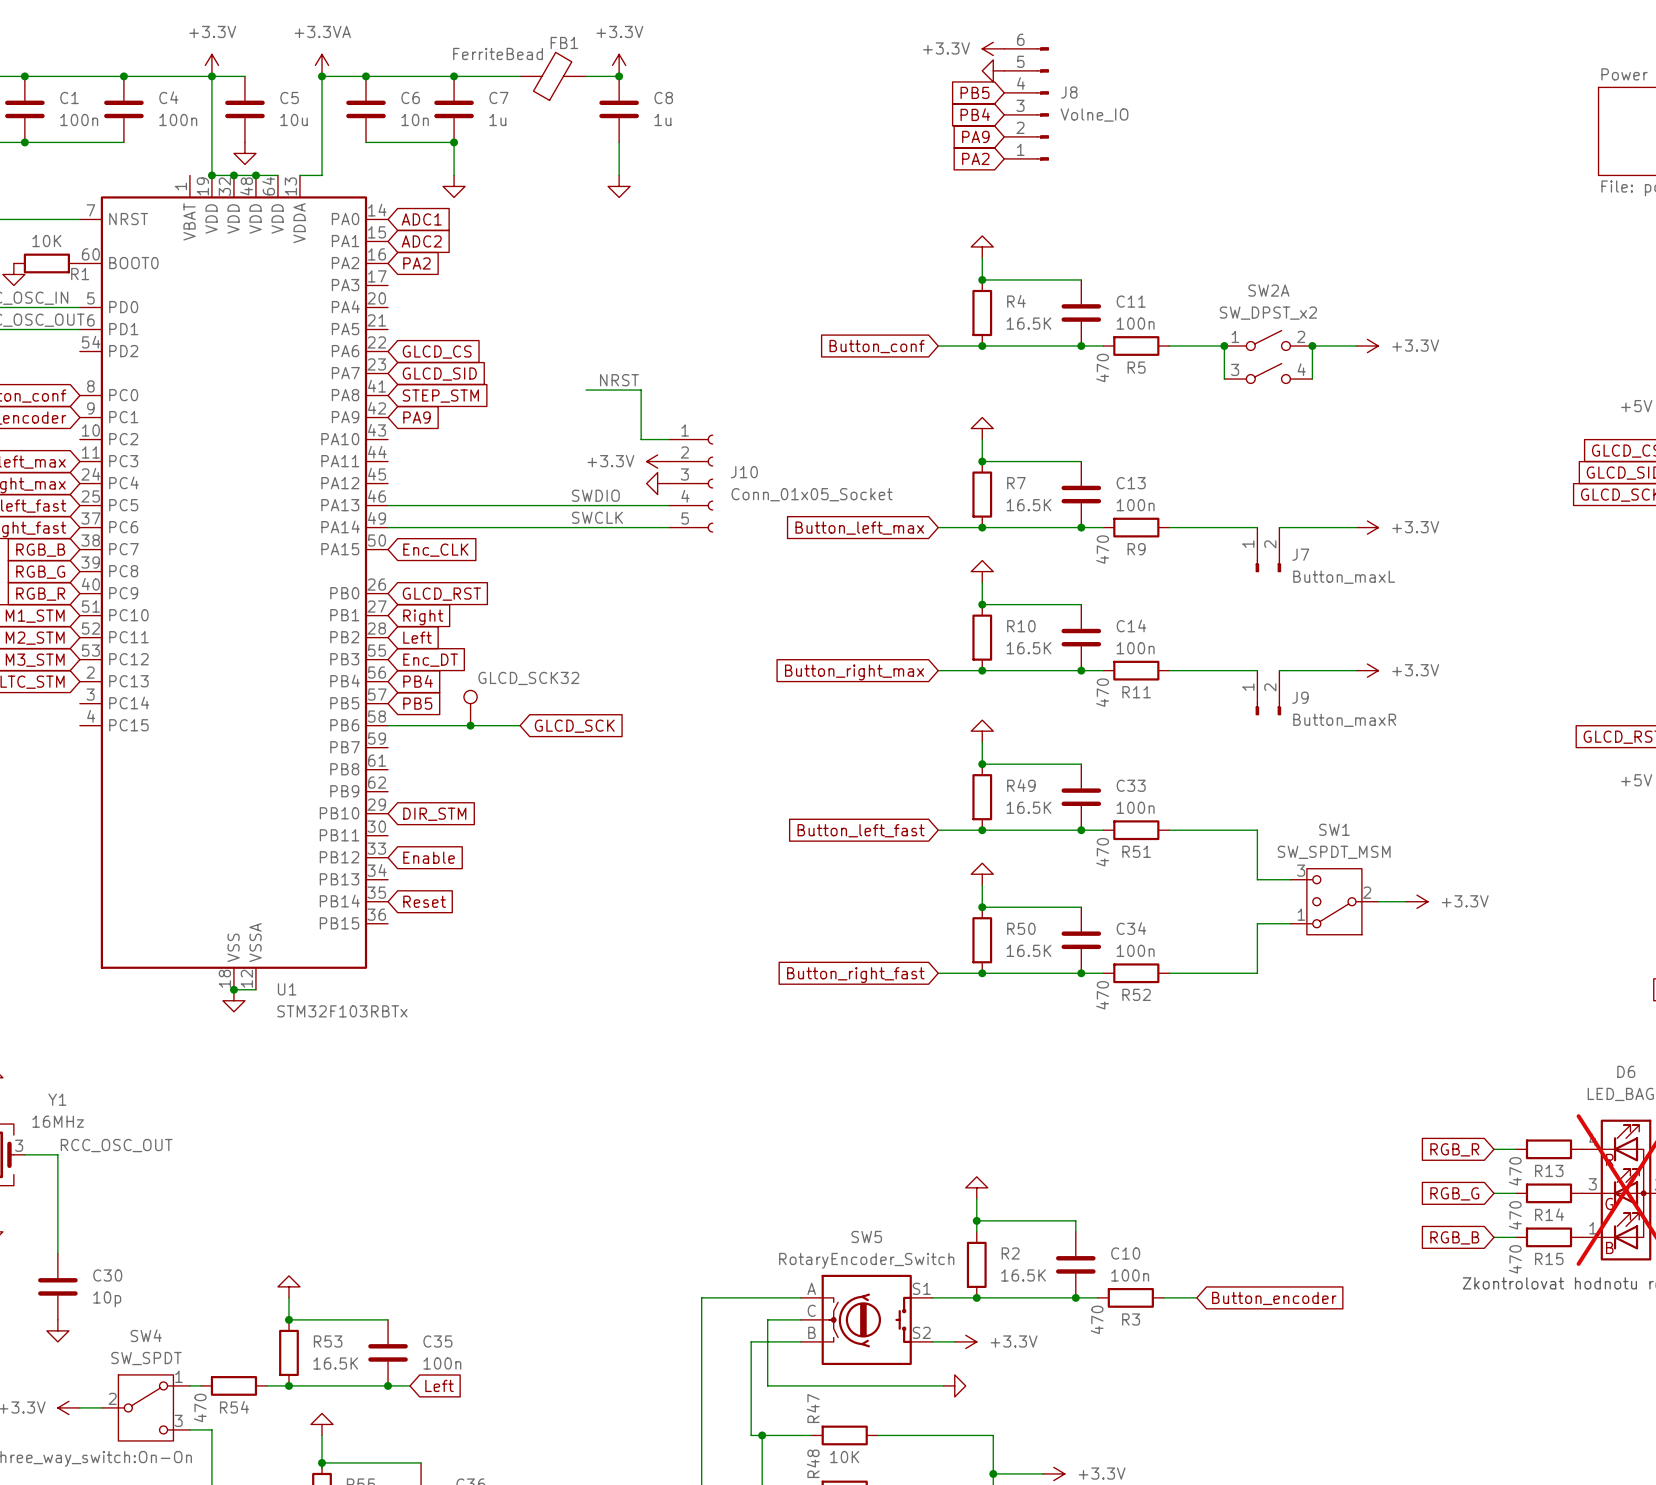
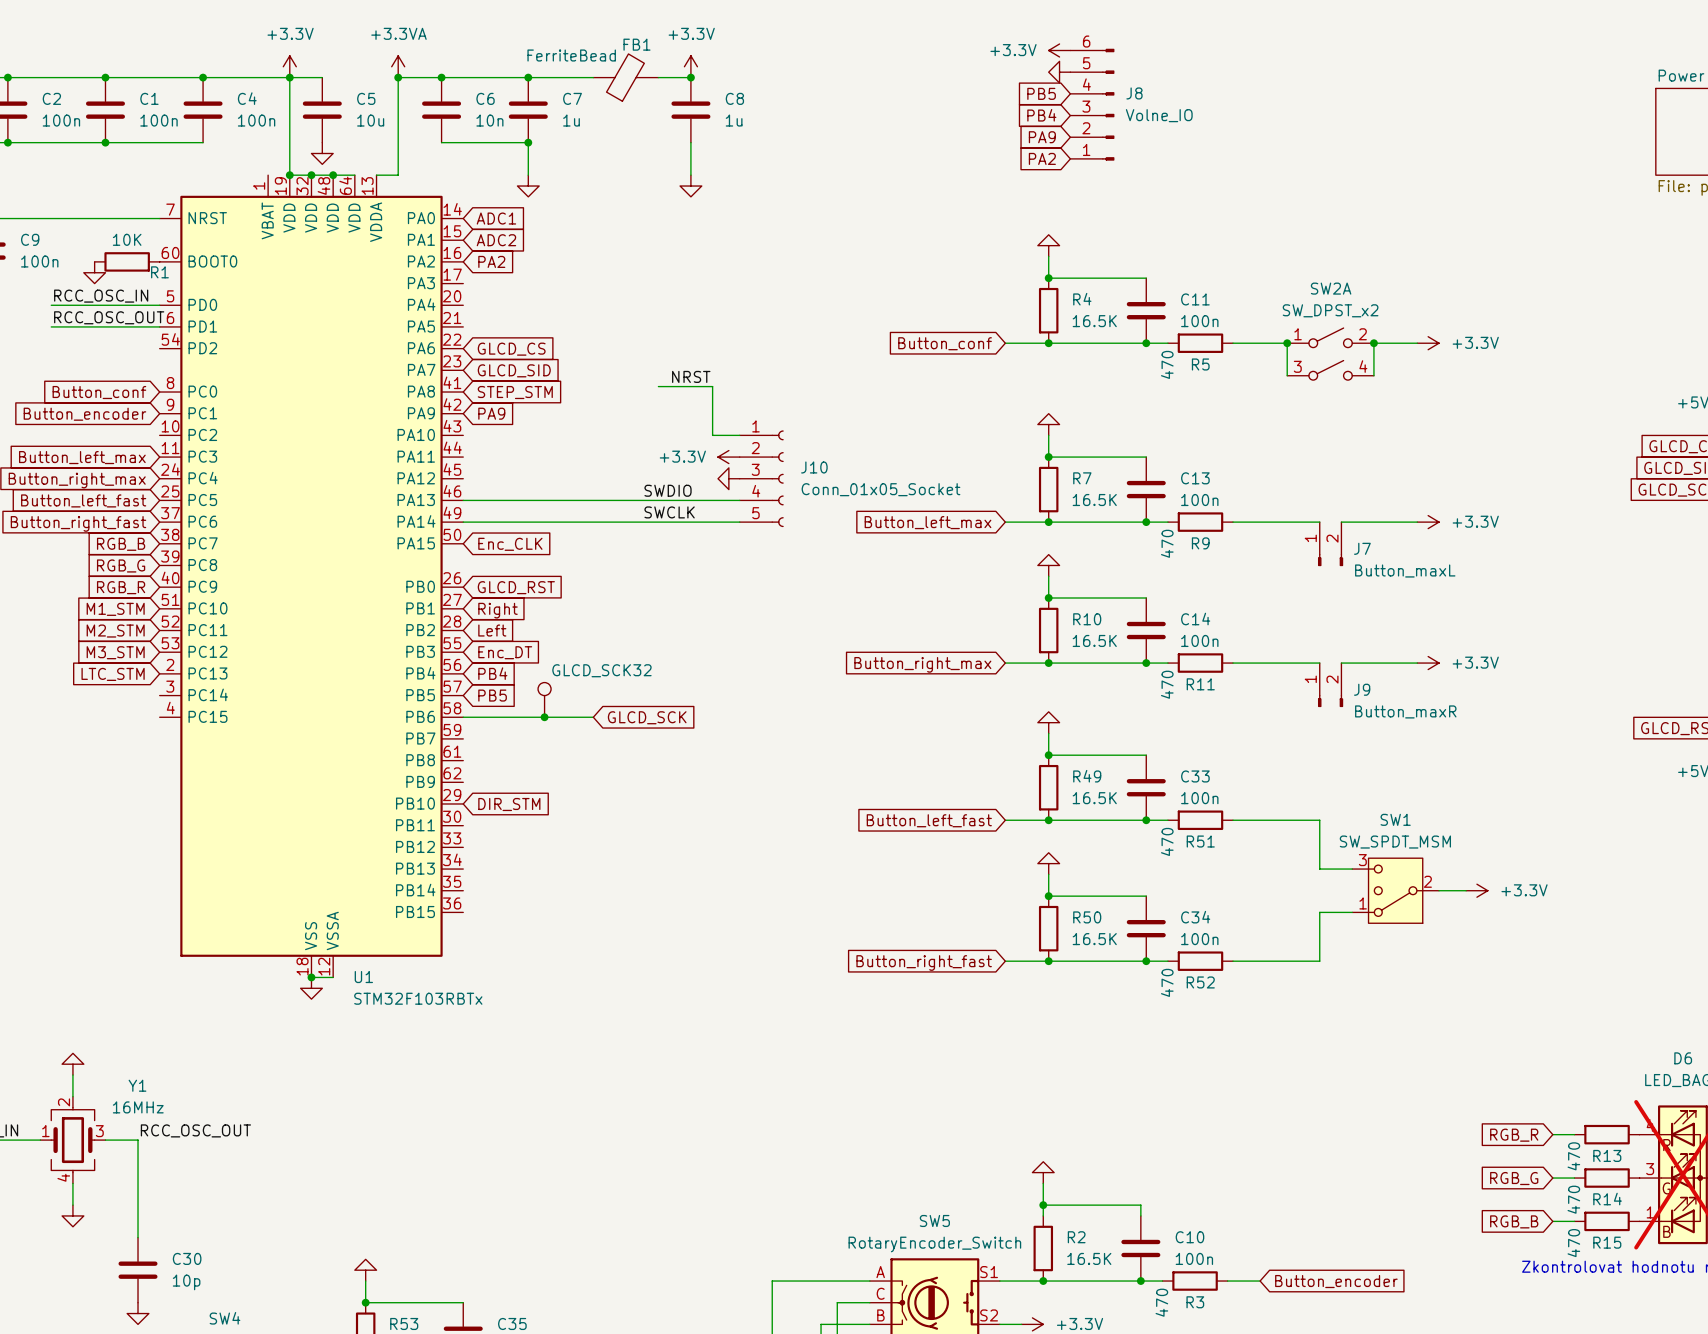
global label: Enable (429, 857) -> none
global label: Reset (424, 901) -> none

